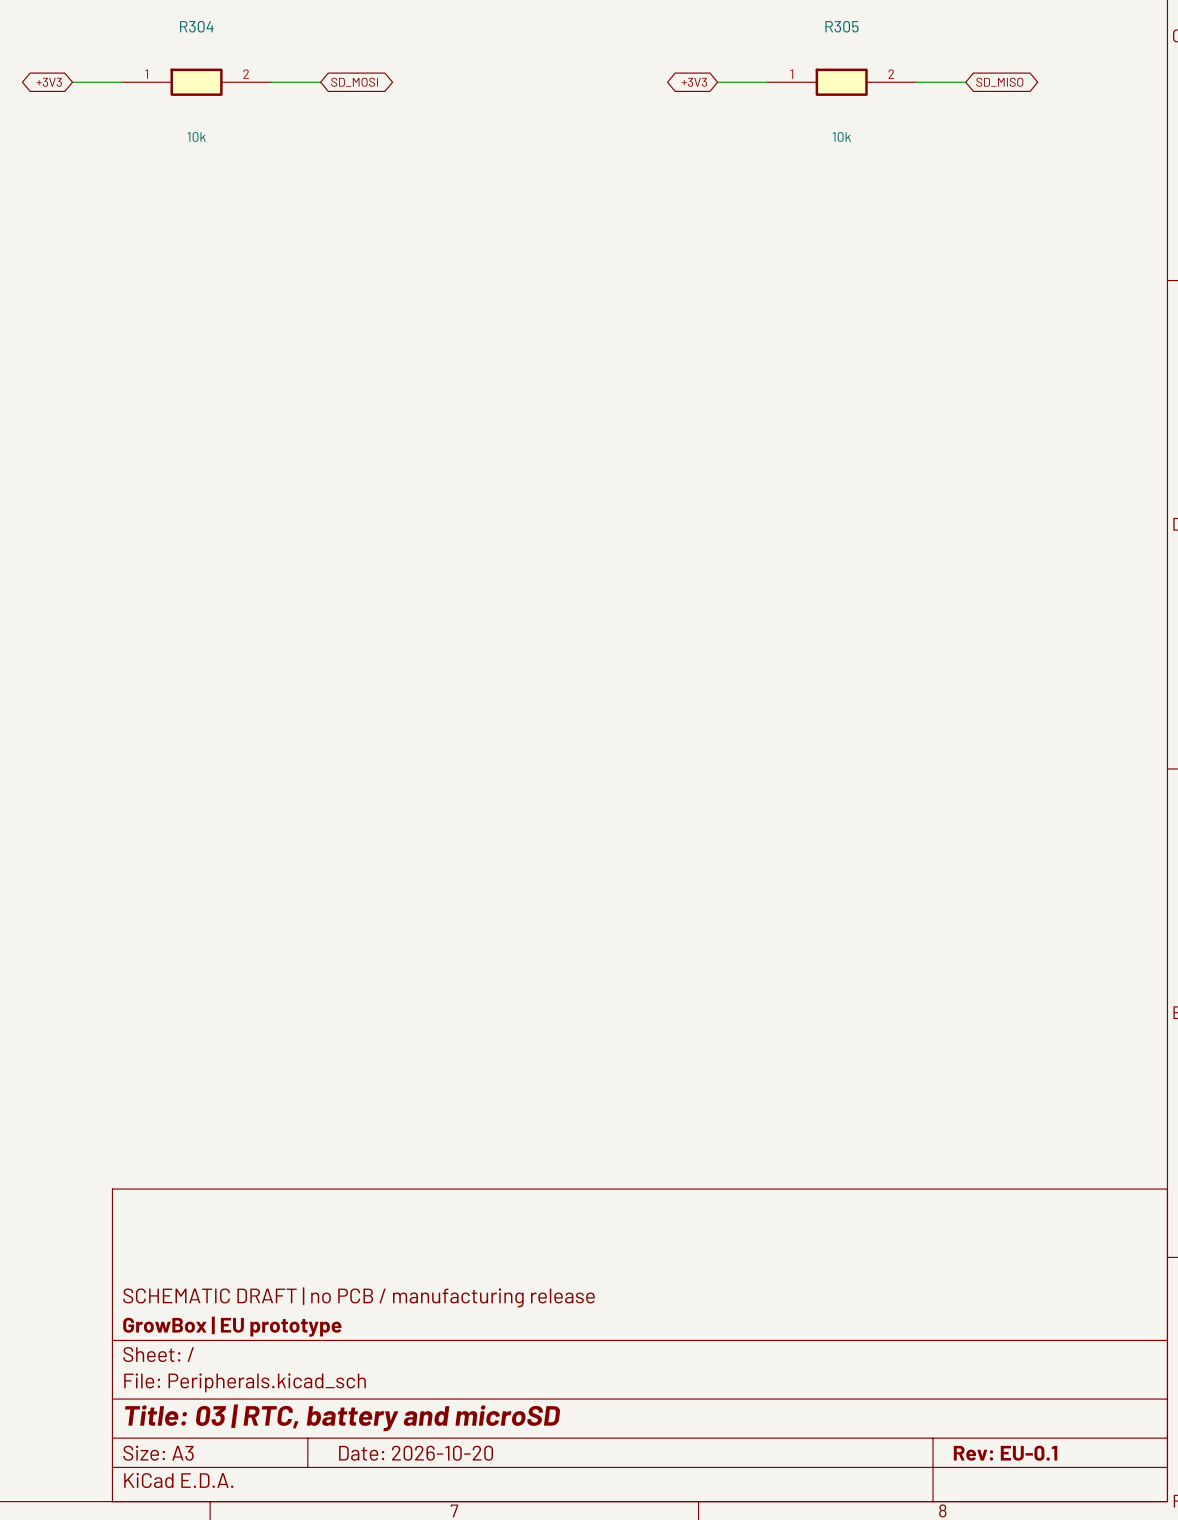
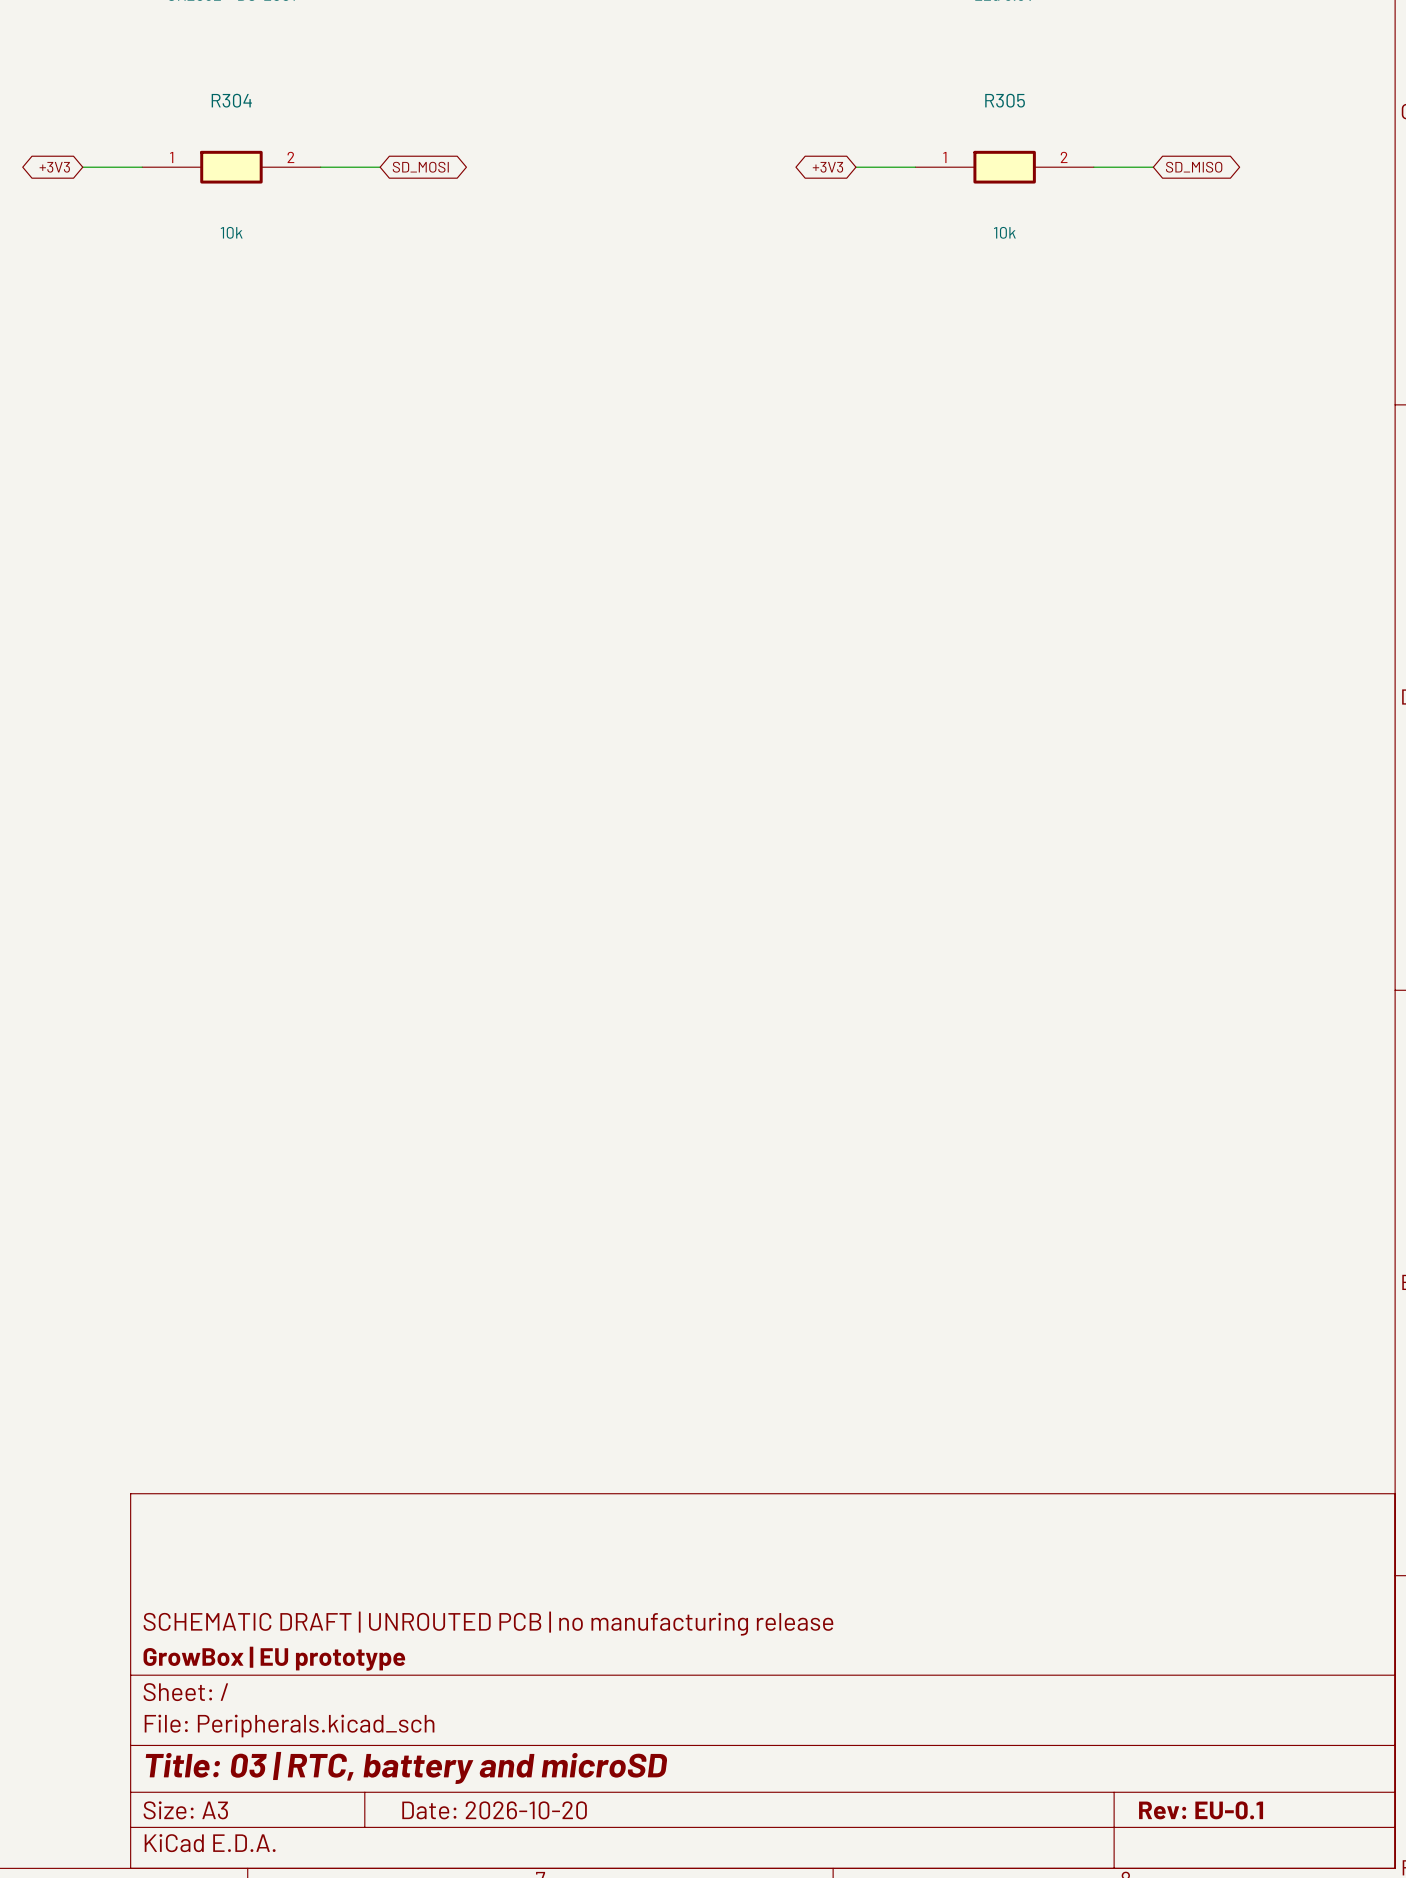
title block: SCHEMATIC DRAFT | no PCB / manufacturing release (359, 1297) -> SCHEMATIC DRAFT | UNROUTED PCB | no manufacturing release (488, 1623)

